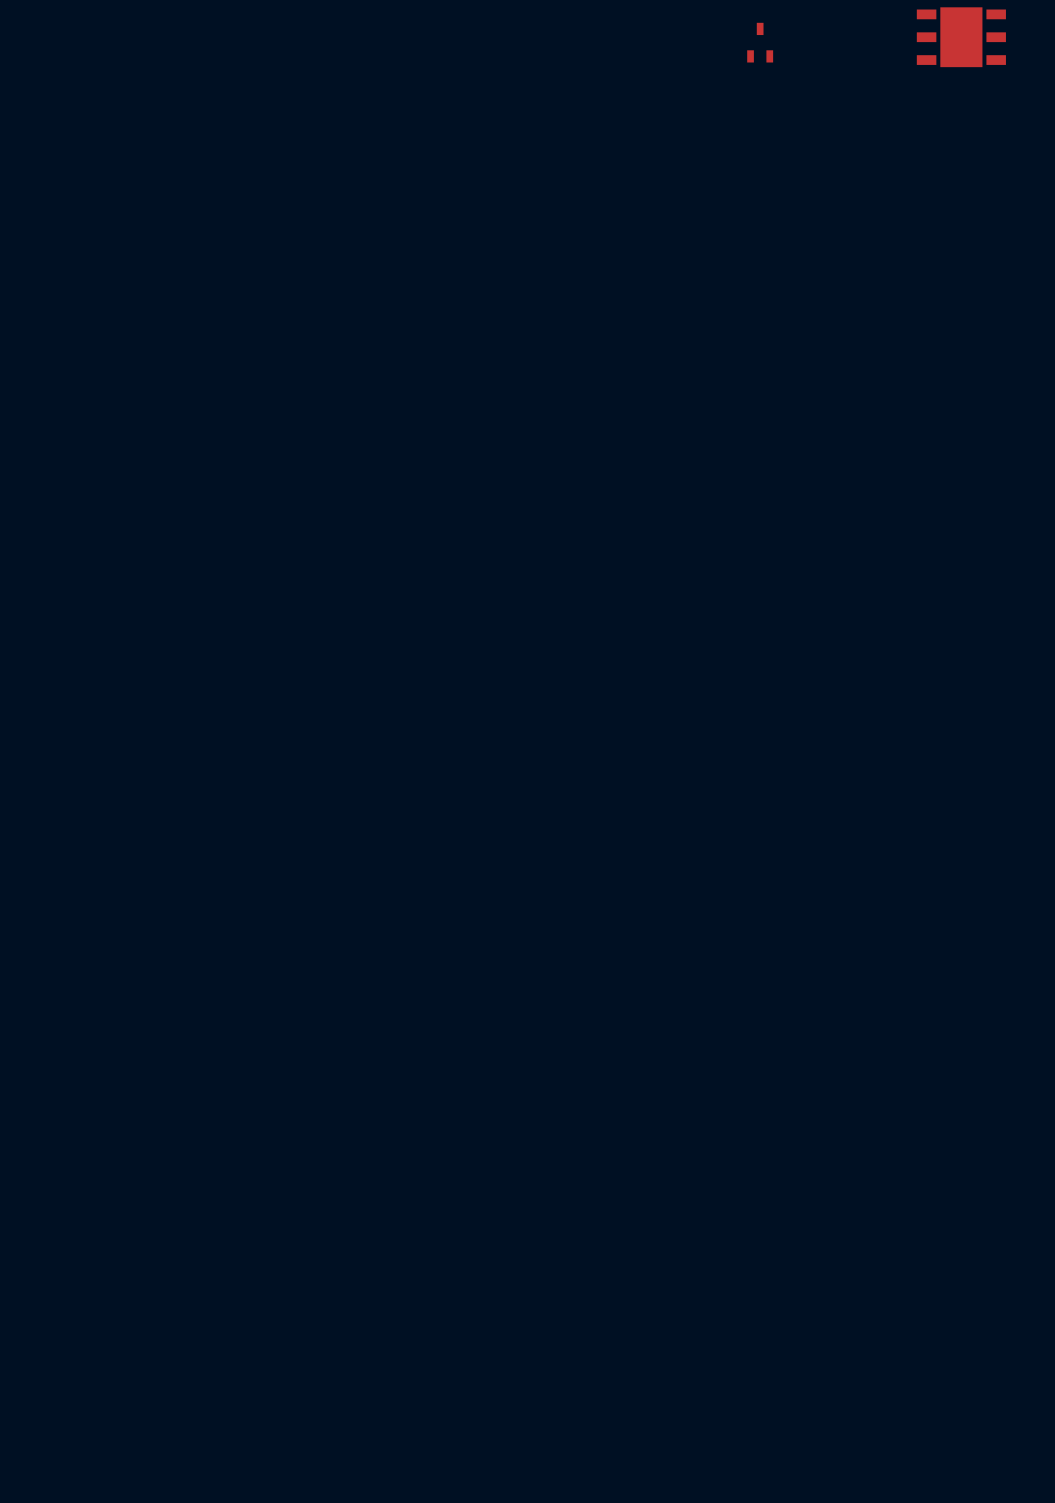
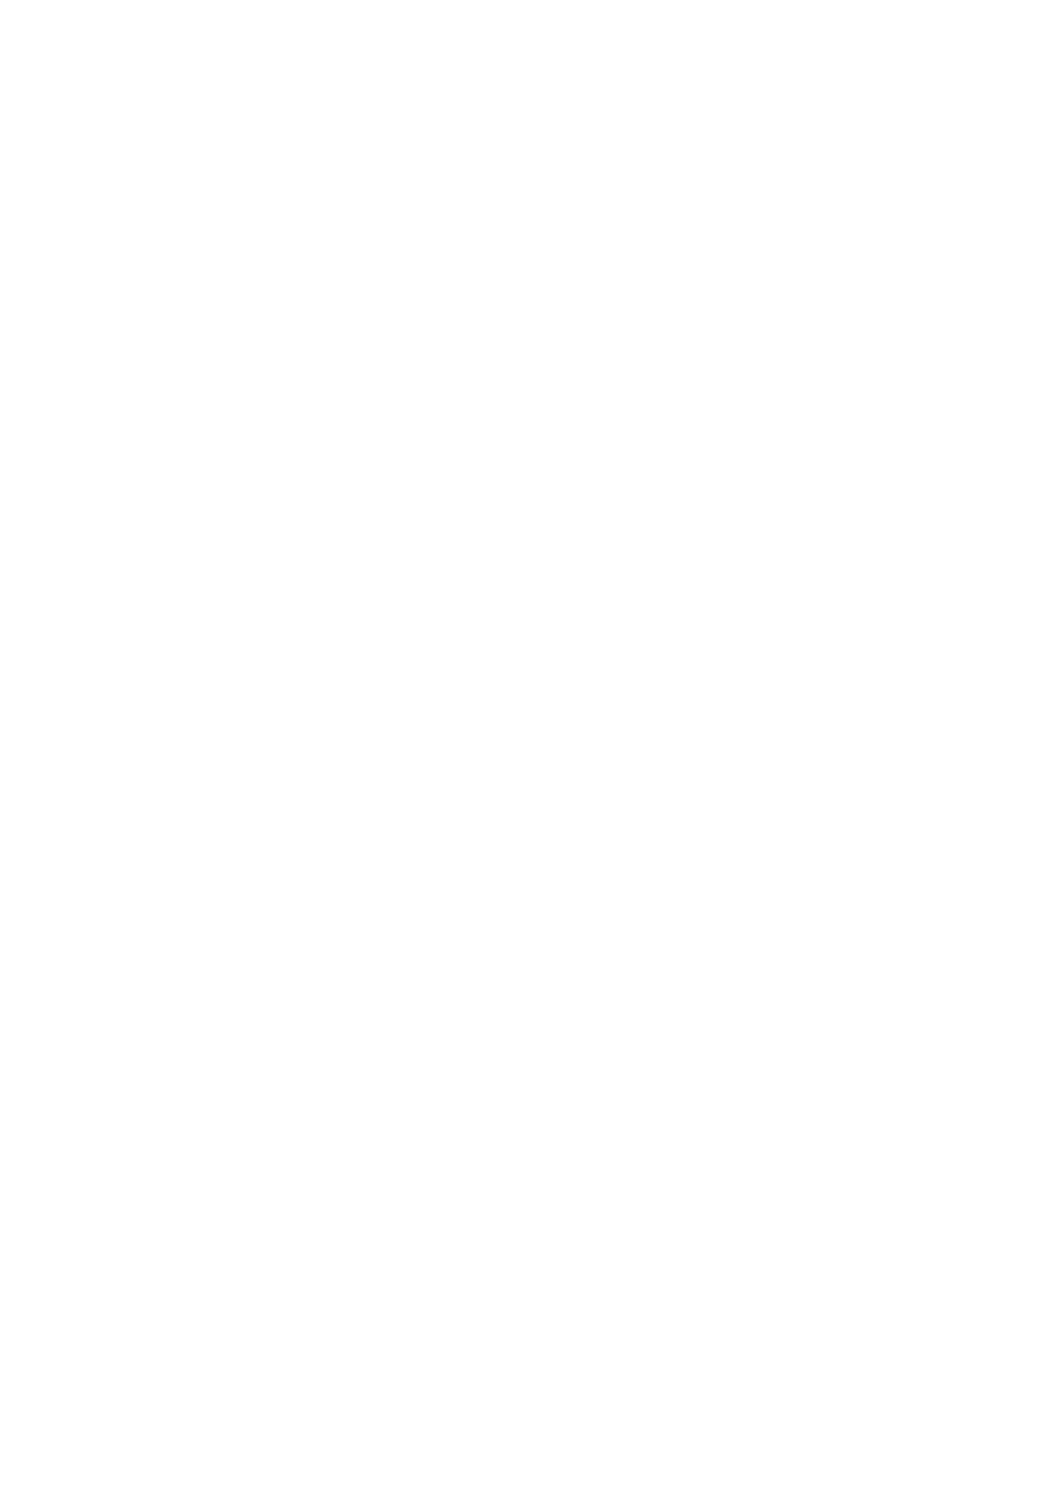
part: (961, 37) -> none
part: (760, 42) -> none

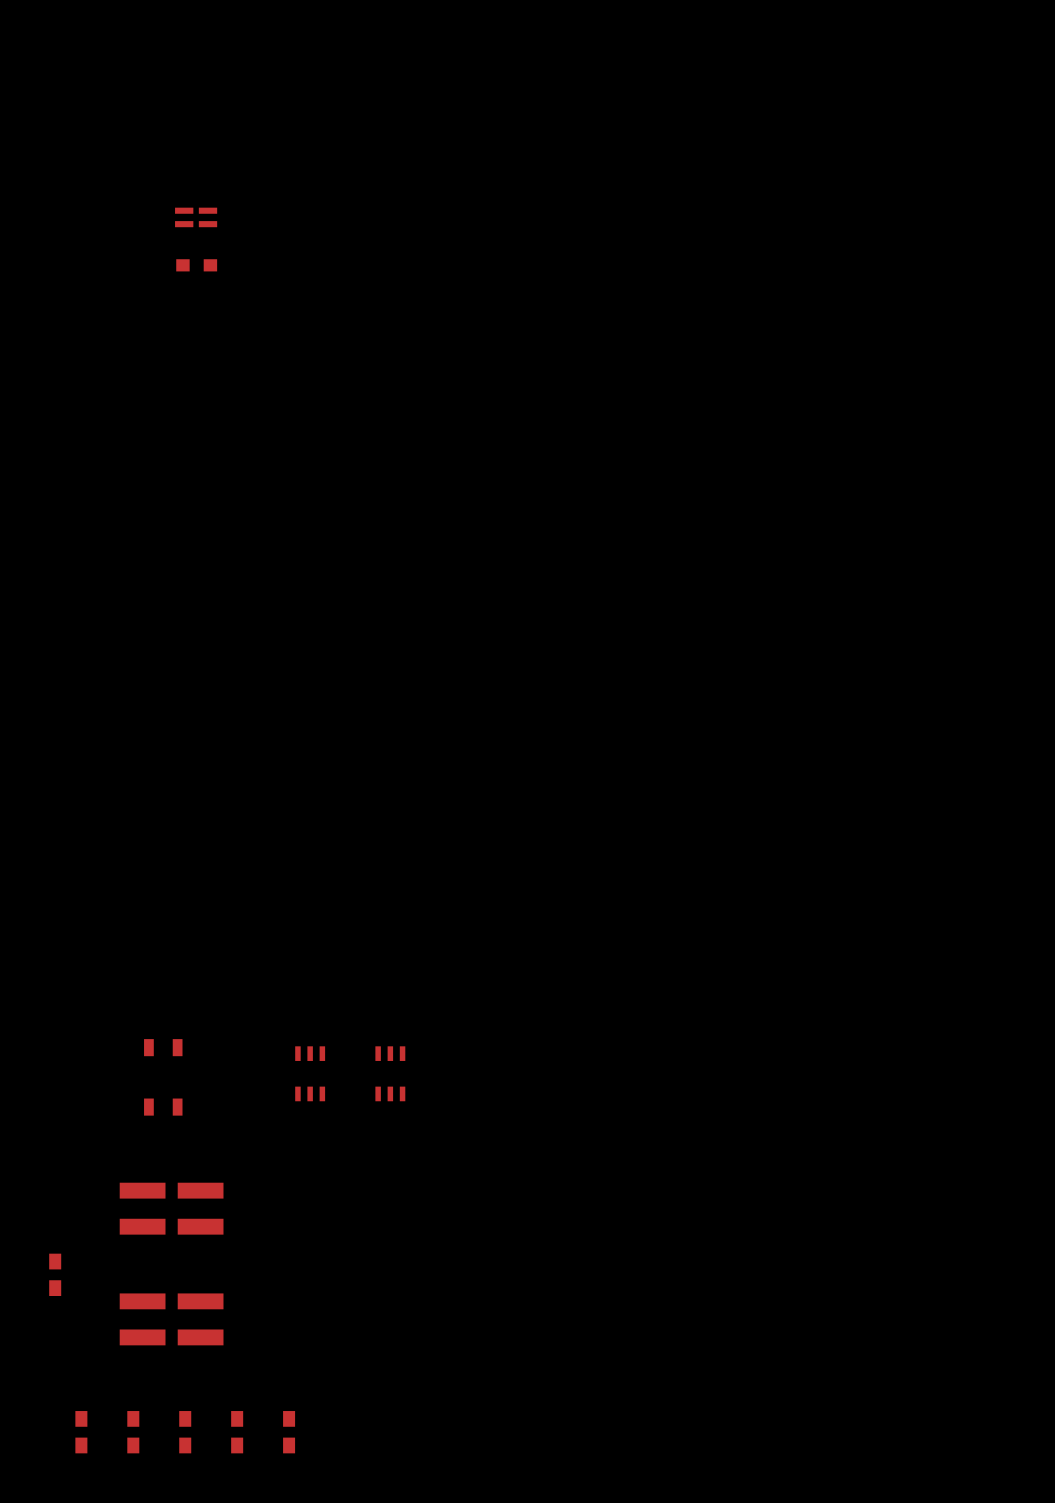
part: none -> (196, 217)
part: none -> (196, 265)
part: none -> (163, 1047)
part: none -> (310, 1073)
part: none -> (390, 1073)
part: none -> (163, 1107)
part: none -> (171, 1208)
part: none -> (55, 1274)
part: none -> (171, 1319)
part: none -> (81, 1432)
part: none -> (133, 1432)
part: none -> (185, 1432)
part: none -> (237, 1432)
part: none -> (289, 1432)

